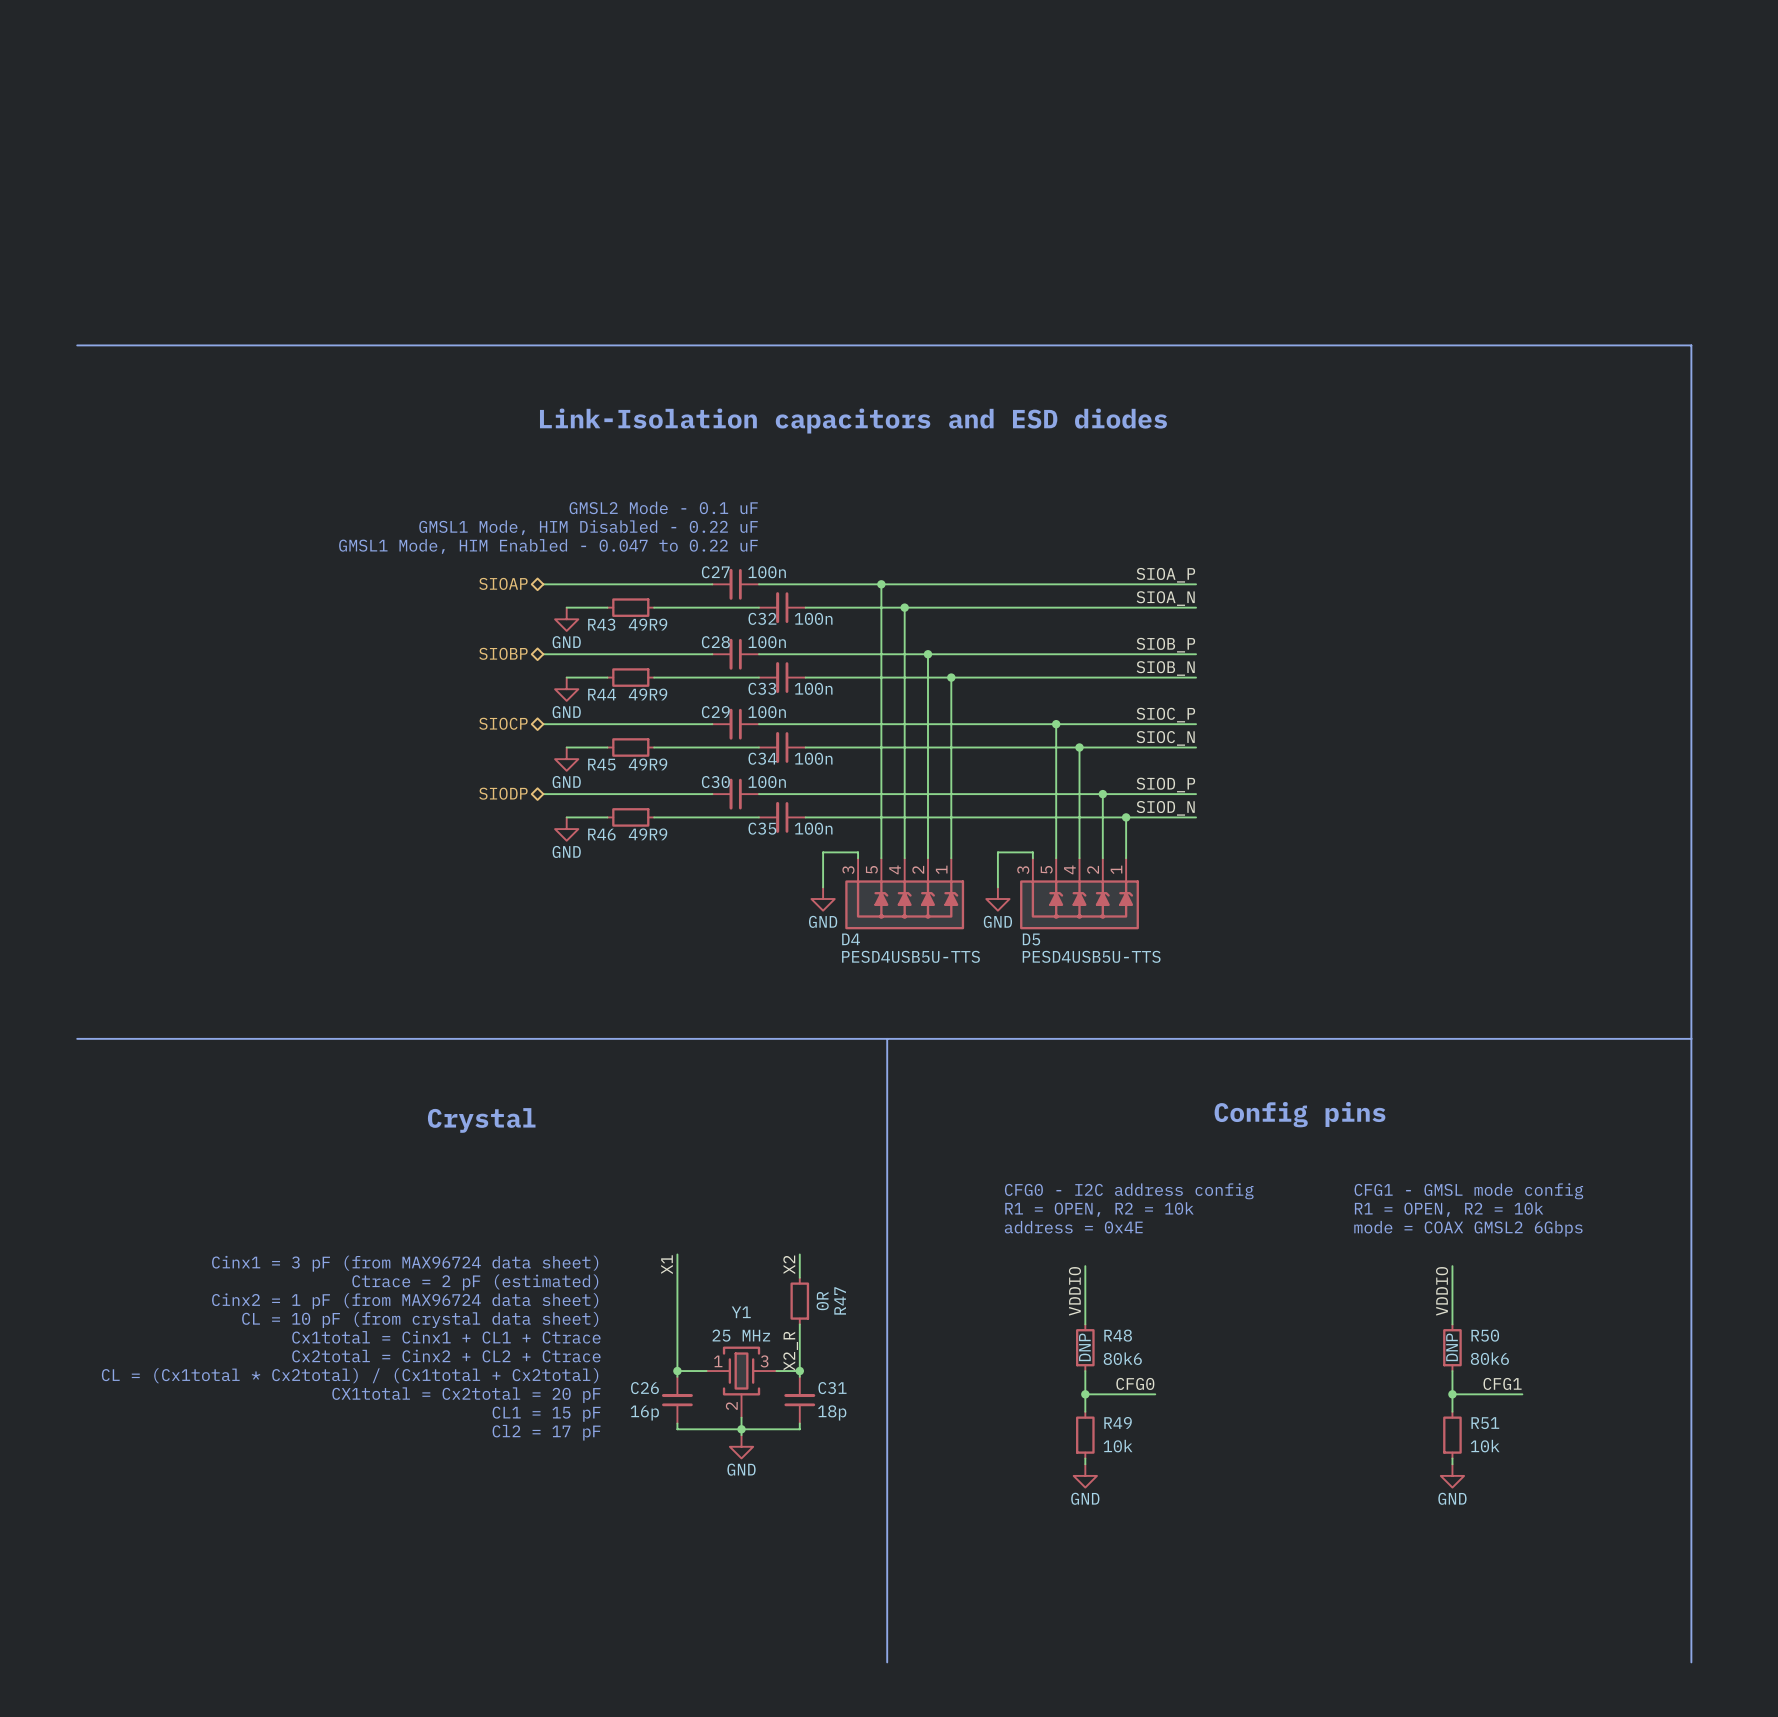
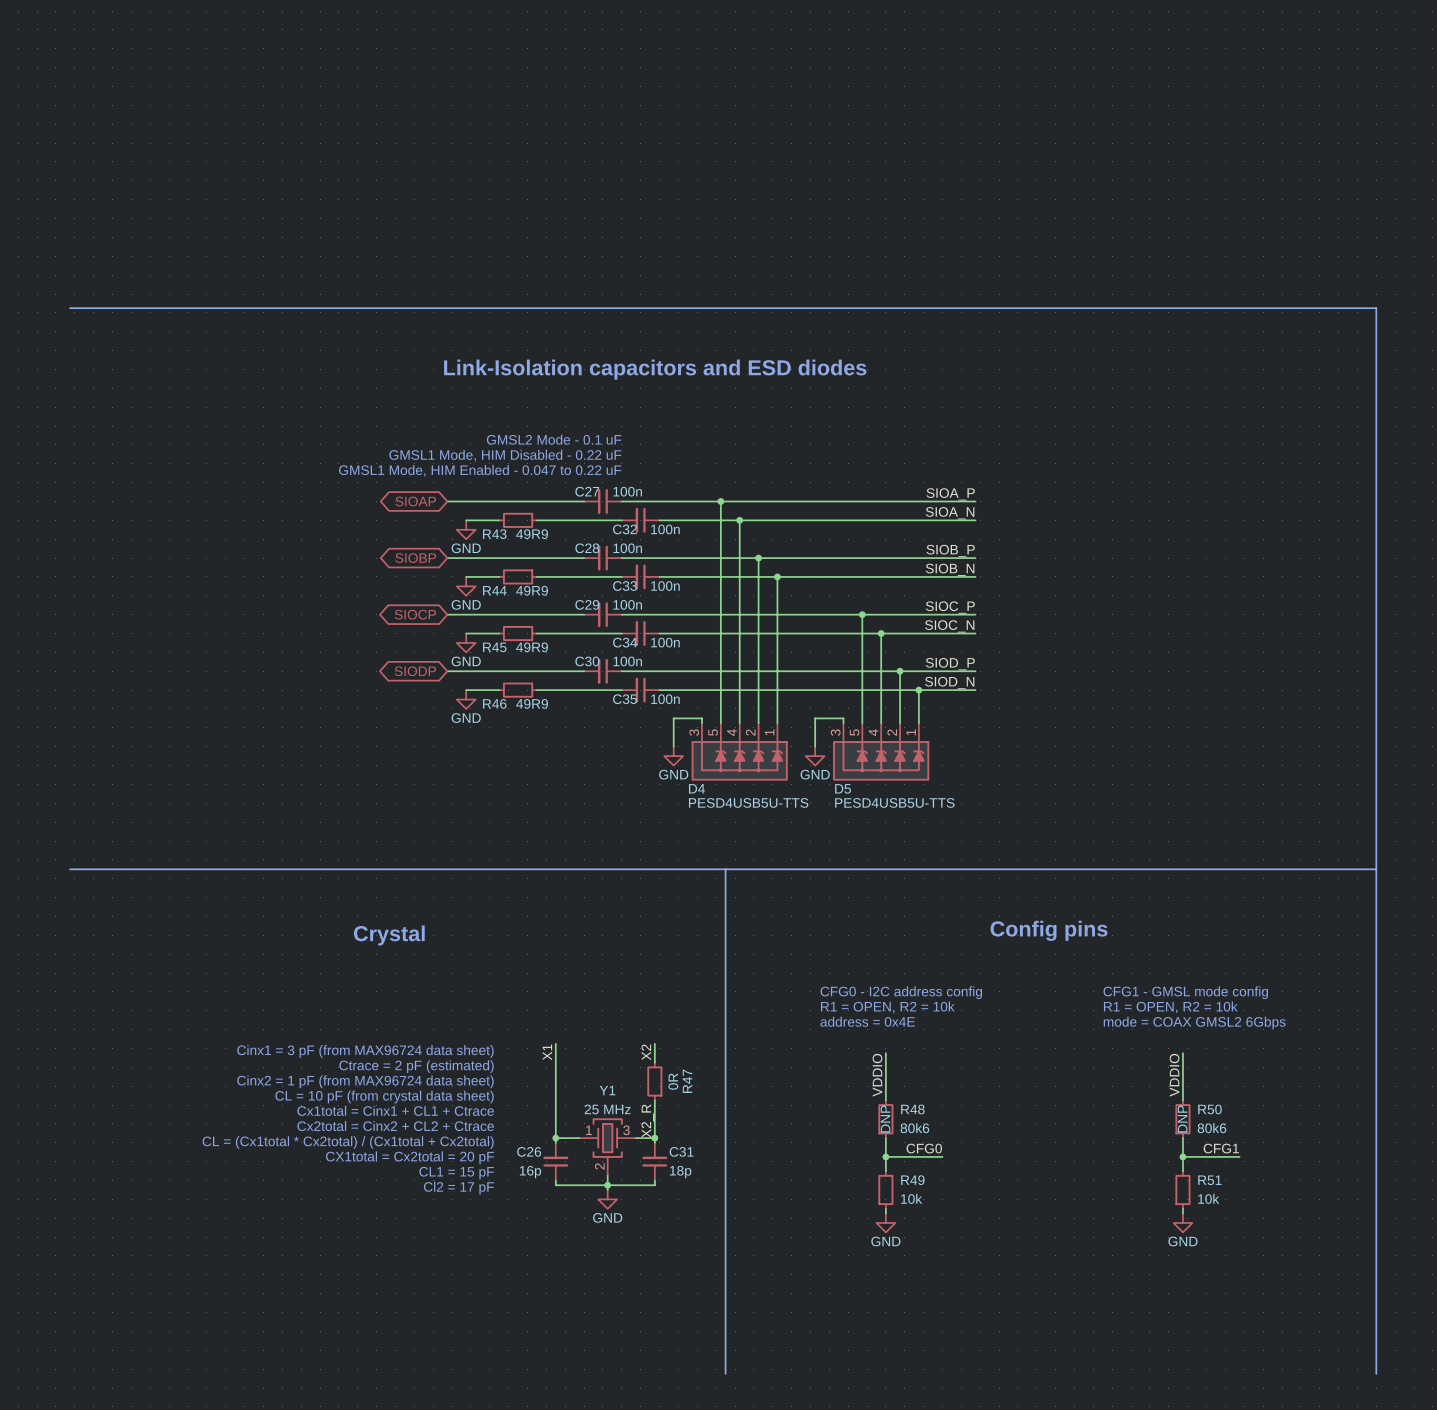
hierarchical label: SIOAP (503, 583) -> none
global label: none -> SIOAP (415, 501)
hierarchical label: SIOBP (503, 653) -> none
global label: none -> SIOBP (415, 558)
hierarchical label: SIOCP (503, 723) -> none
global label: none -> SIOCP (415, 614)
hierarchical label: SIODP (503, 793) -> none
global label: none -> SIODP (415, 671)

